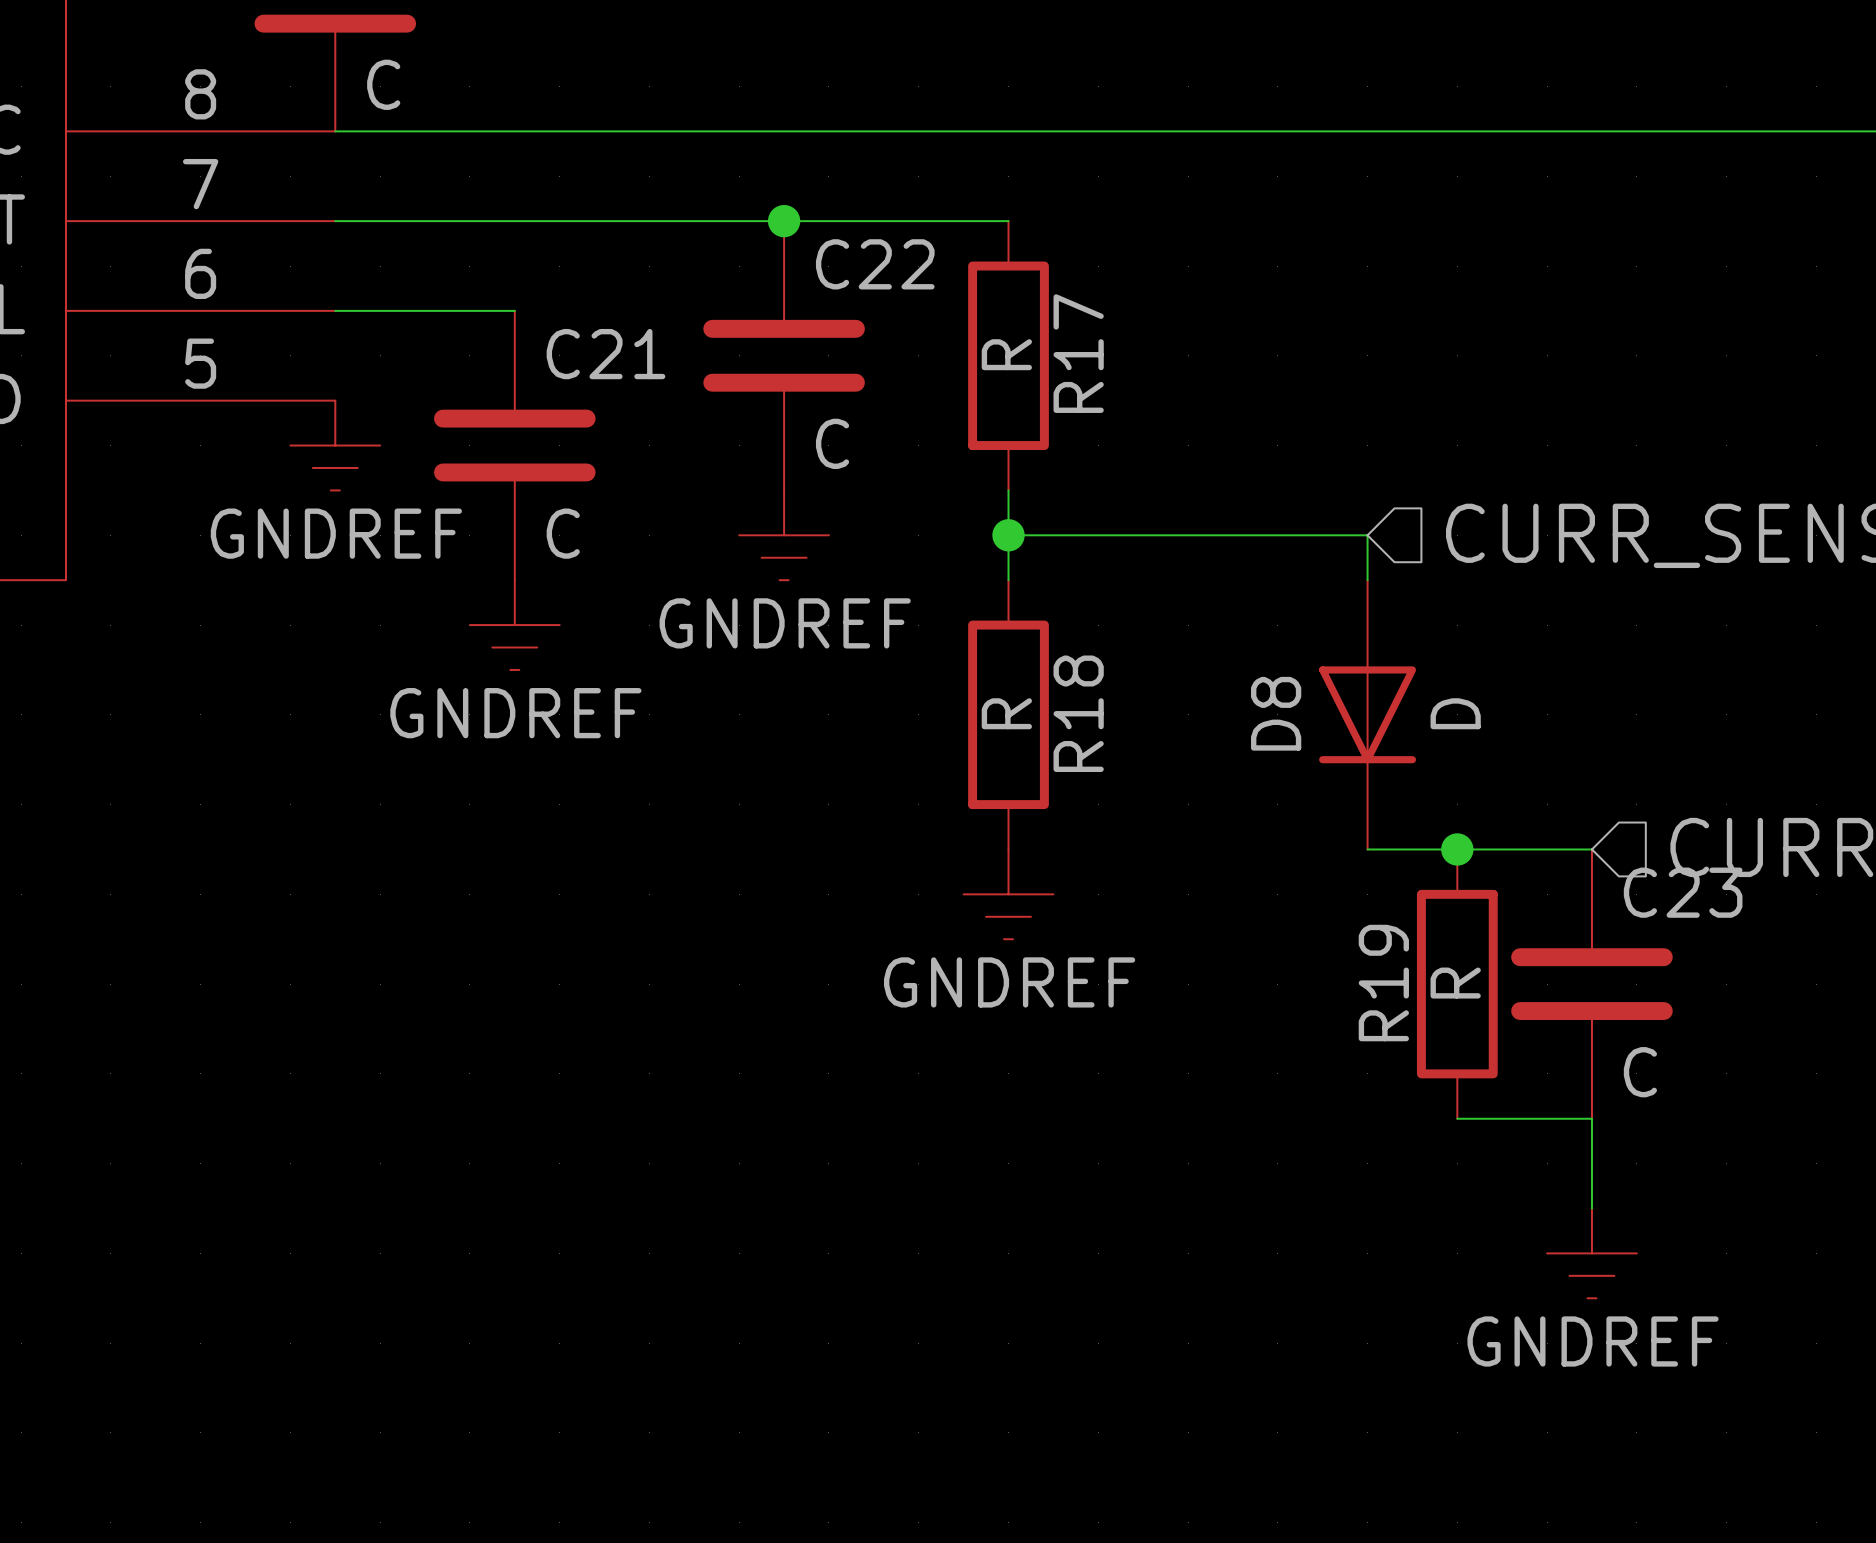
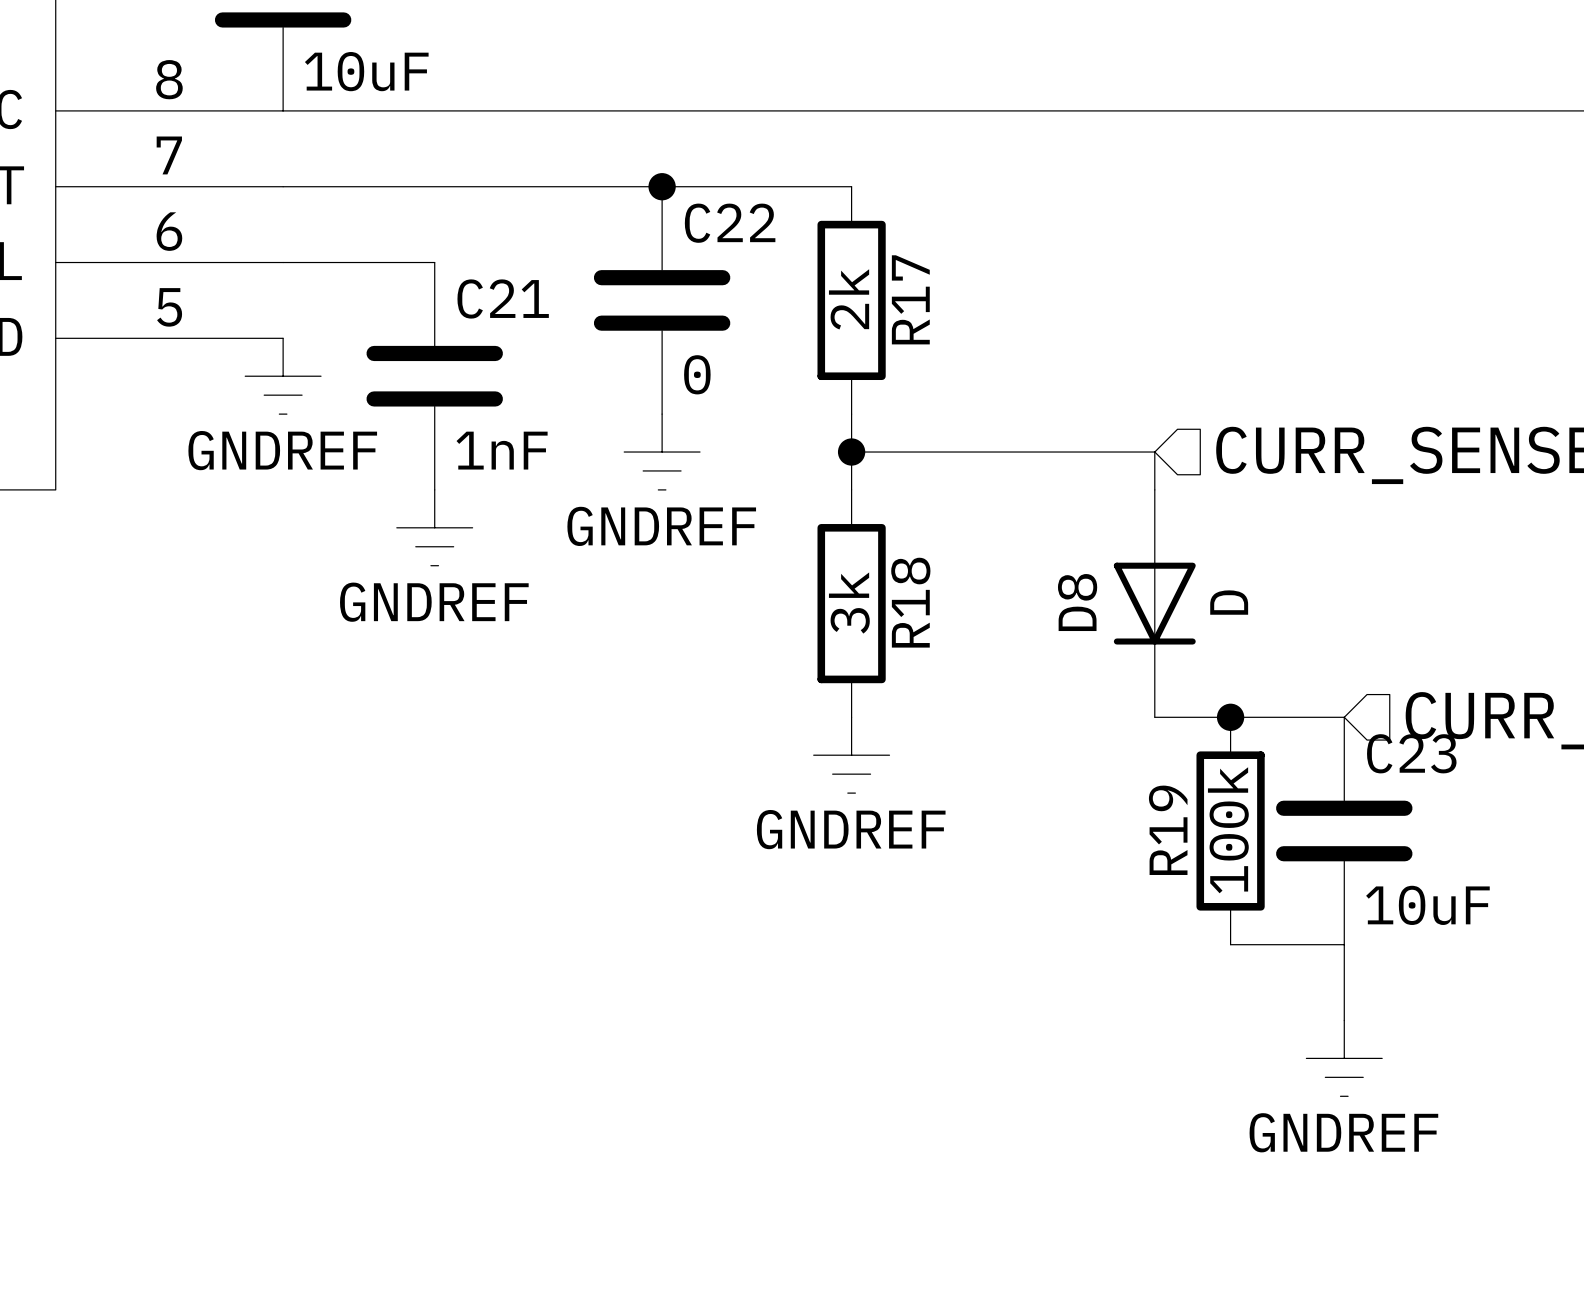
part value: C (383, 84) -> 10uF (366, 71)
R17 value: R (1006, 354) -> 2k (849, 299)
C22 value: C (832, 443) -> 0 (697, 374)
C21 value: C (563, 533) -> 1nF (502, 450)
R18 value: R (1006, 713) -> 3k (849, 603)
R19 value: R (1455, 983) -> 100k (1228, 830)
C23 value: C (1640, 1072) -> 10uF (1427, 905)

